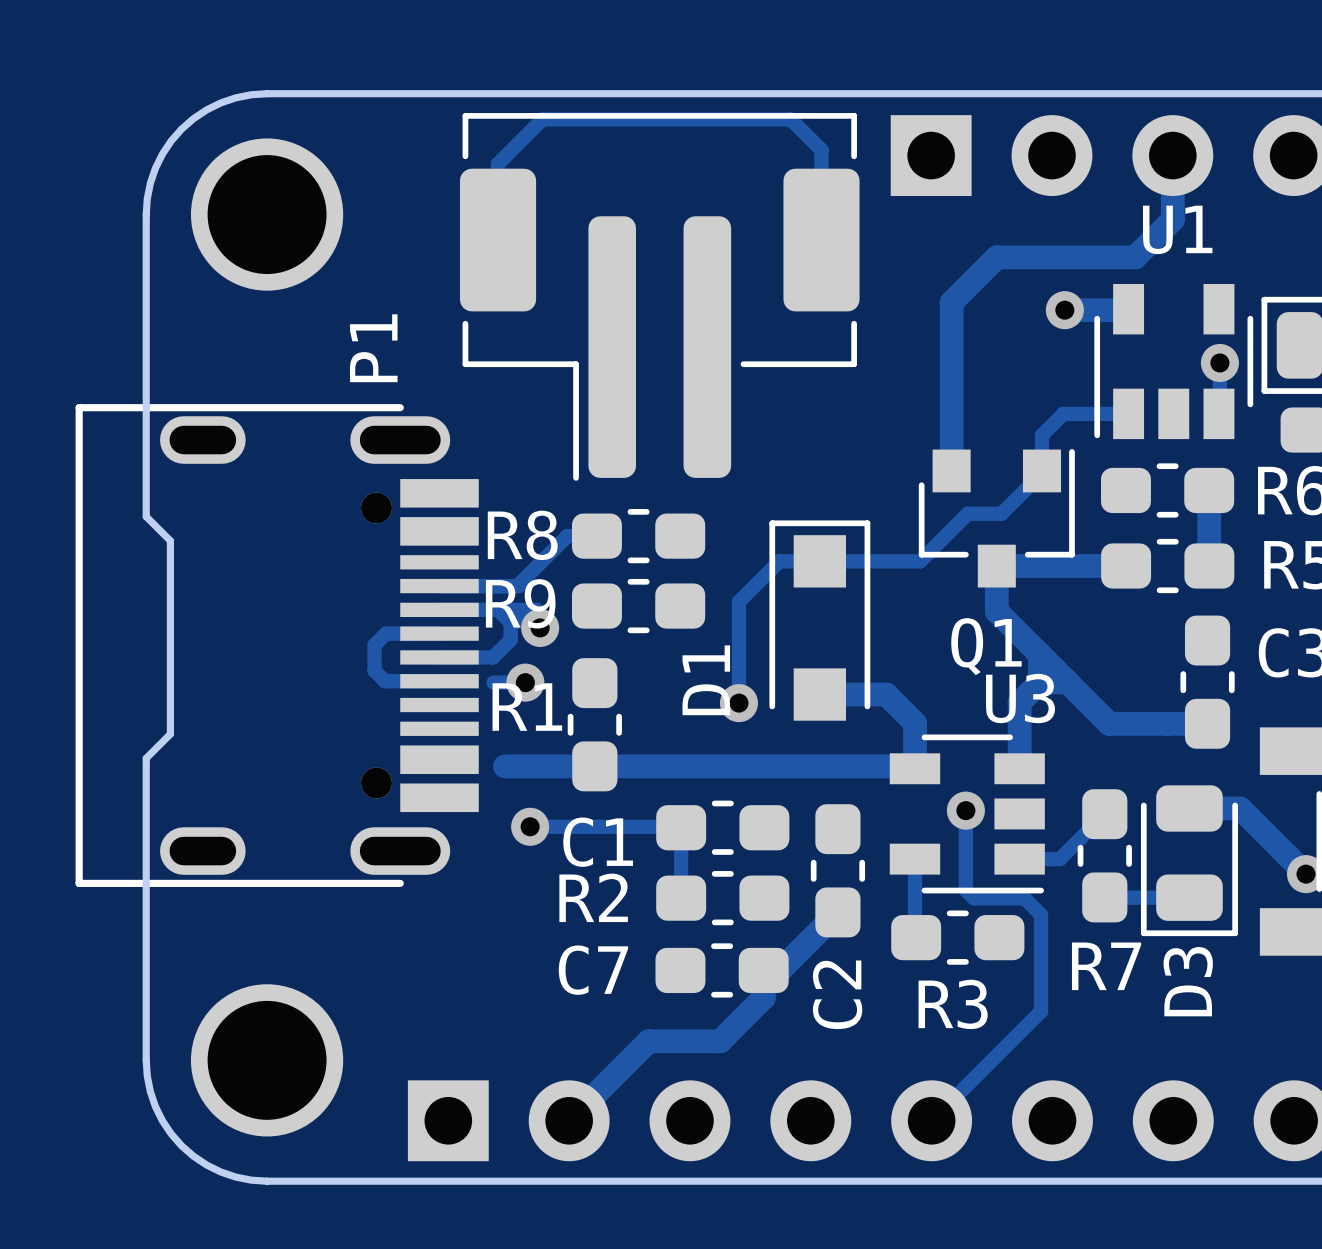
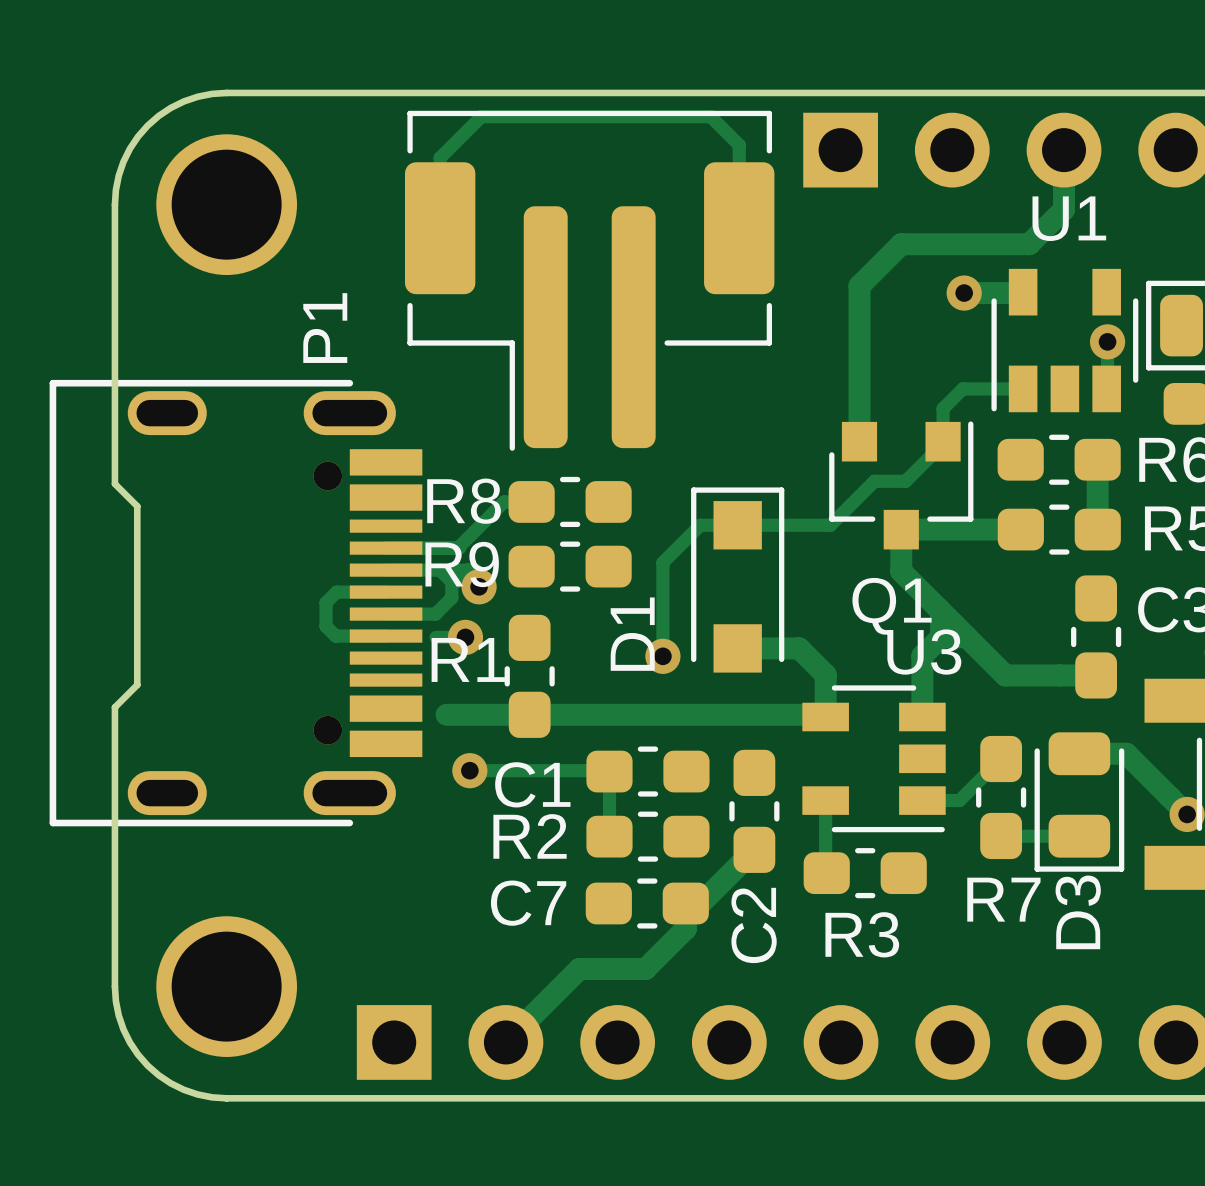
track: (965, 810) (965, 890) (974, 898) (1024, 898) (1041, 914) (1041, 1011) (931, 1120) -> none
via: (965, 810) -> none

